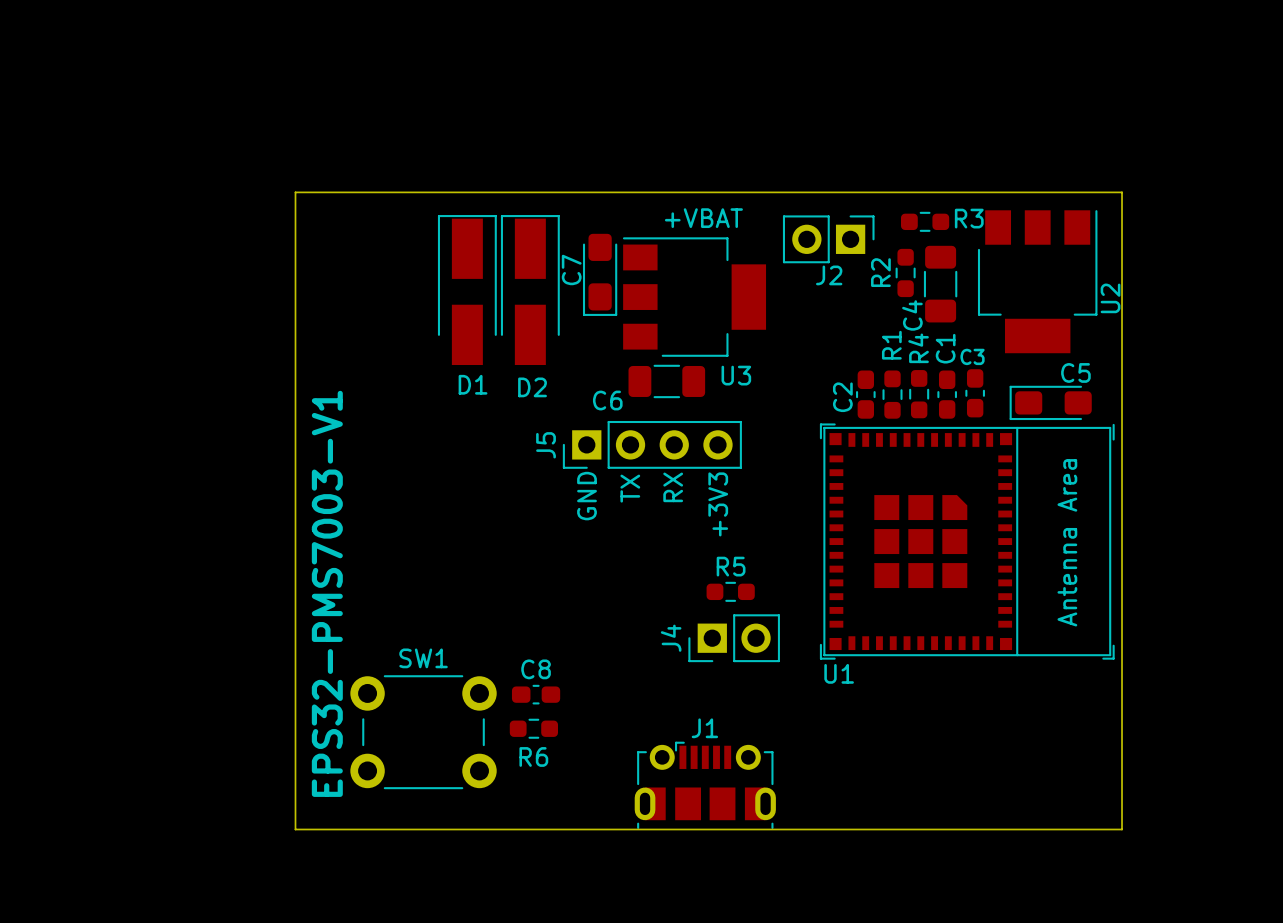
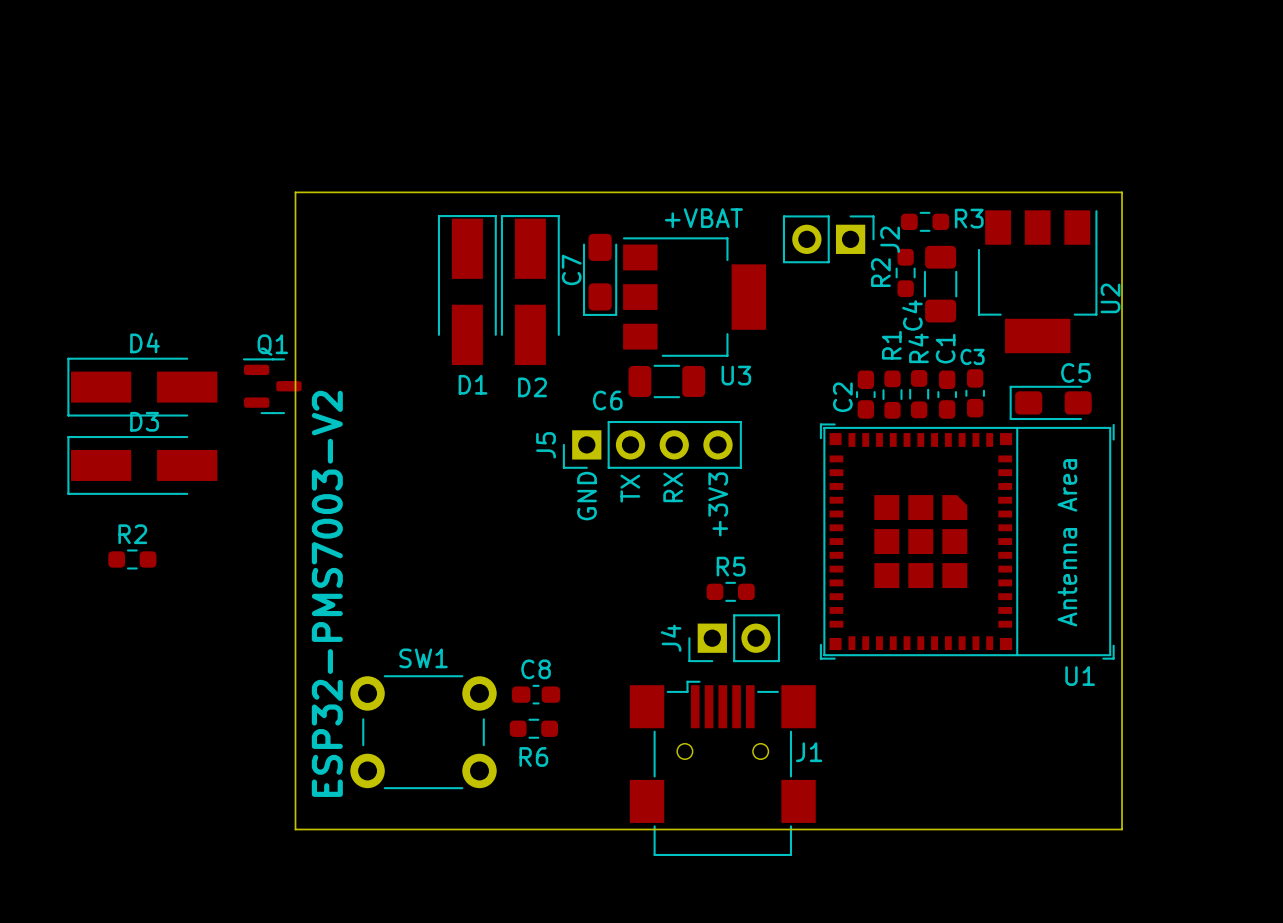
J2 name rotation: 0° (829, 275) -> 90° counterclockwise (890, 239)
J2 name position: J2 (829, 275) -> J2 (890, 239)
Q1: none -> (272, 386)
D4: none -> (142, 387)
D3: none -> (142, 465)
R2: none -> (132, 559)
text: EPS32-PMS7003-V1 (327, 593) -> ESP32-PMS7003-V2 (327, 593)
U1 name position: U1 (839, 673) -> U1 (1080, 676)
J1 name position: J1 (704, 728) -> J1 (809, 752)
J1 footprint: [634, 741, 776, 829] -> [629, 680, 816, 857]

